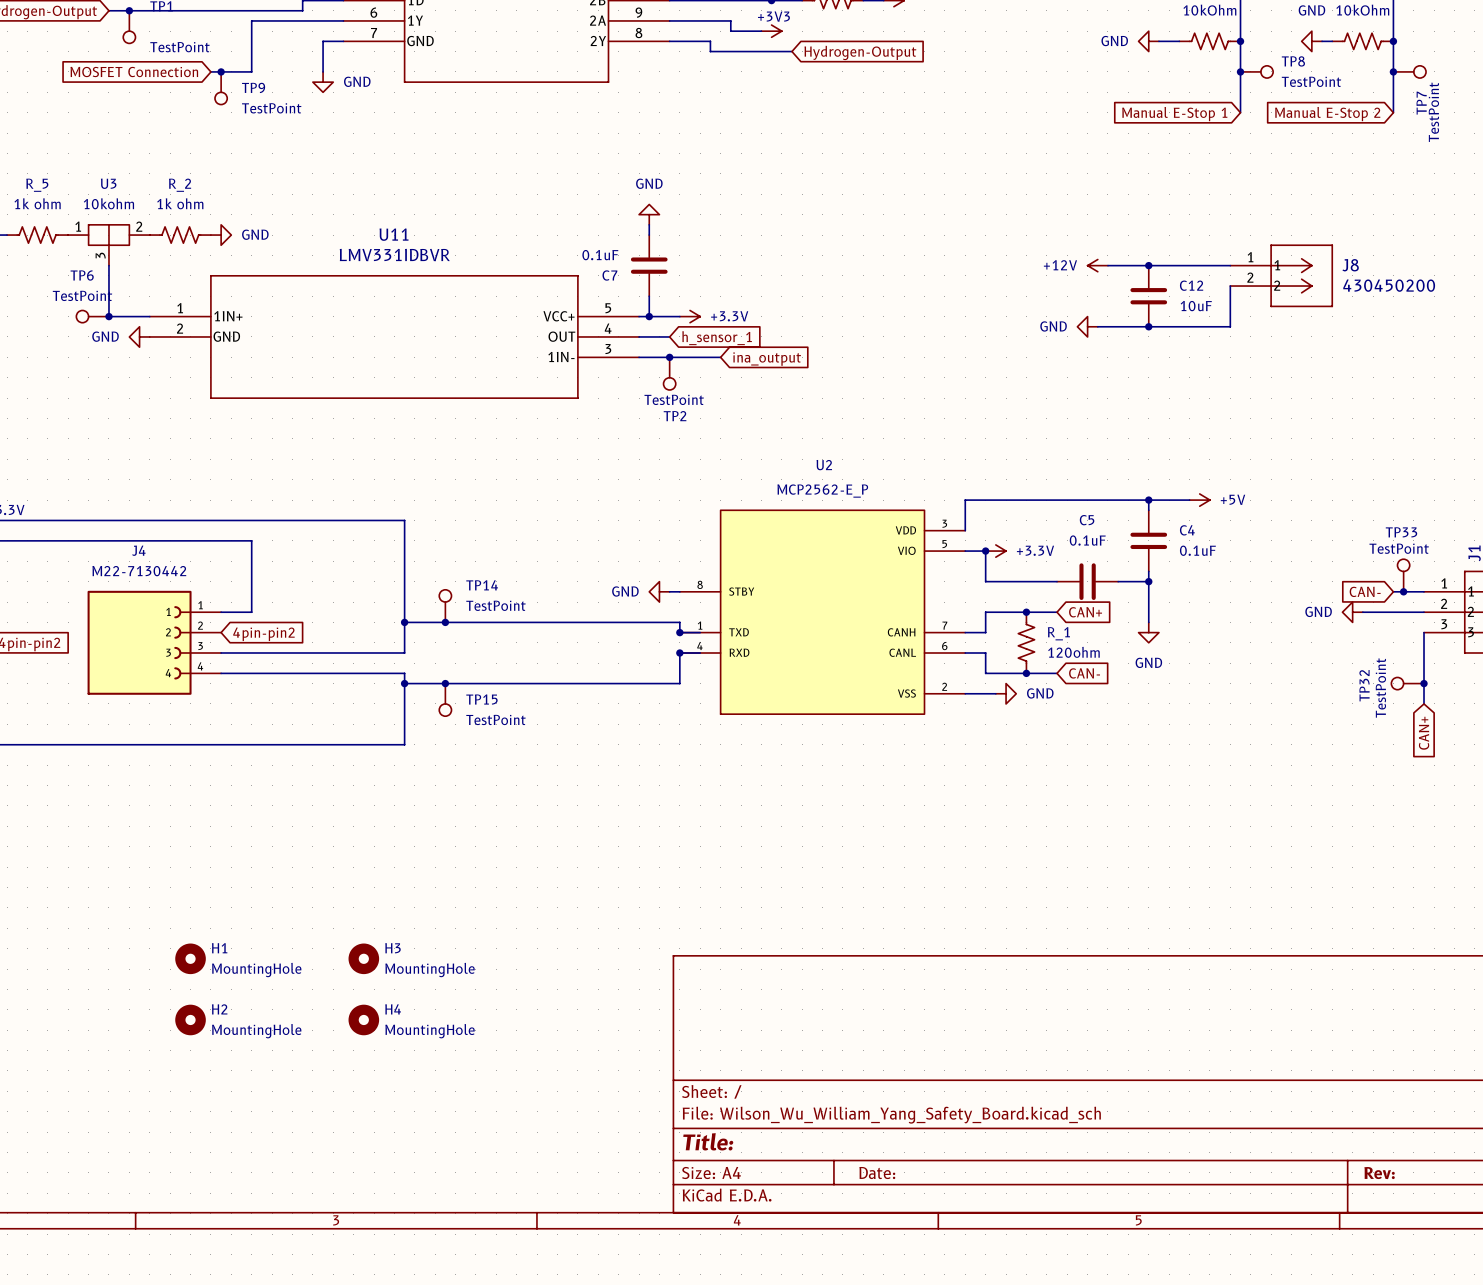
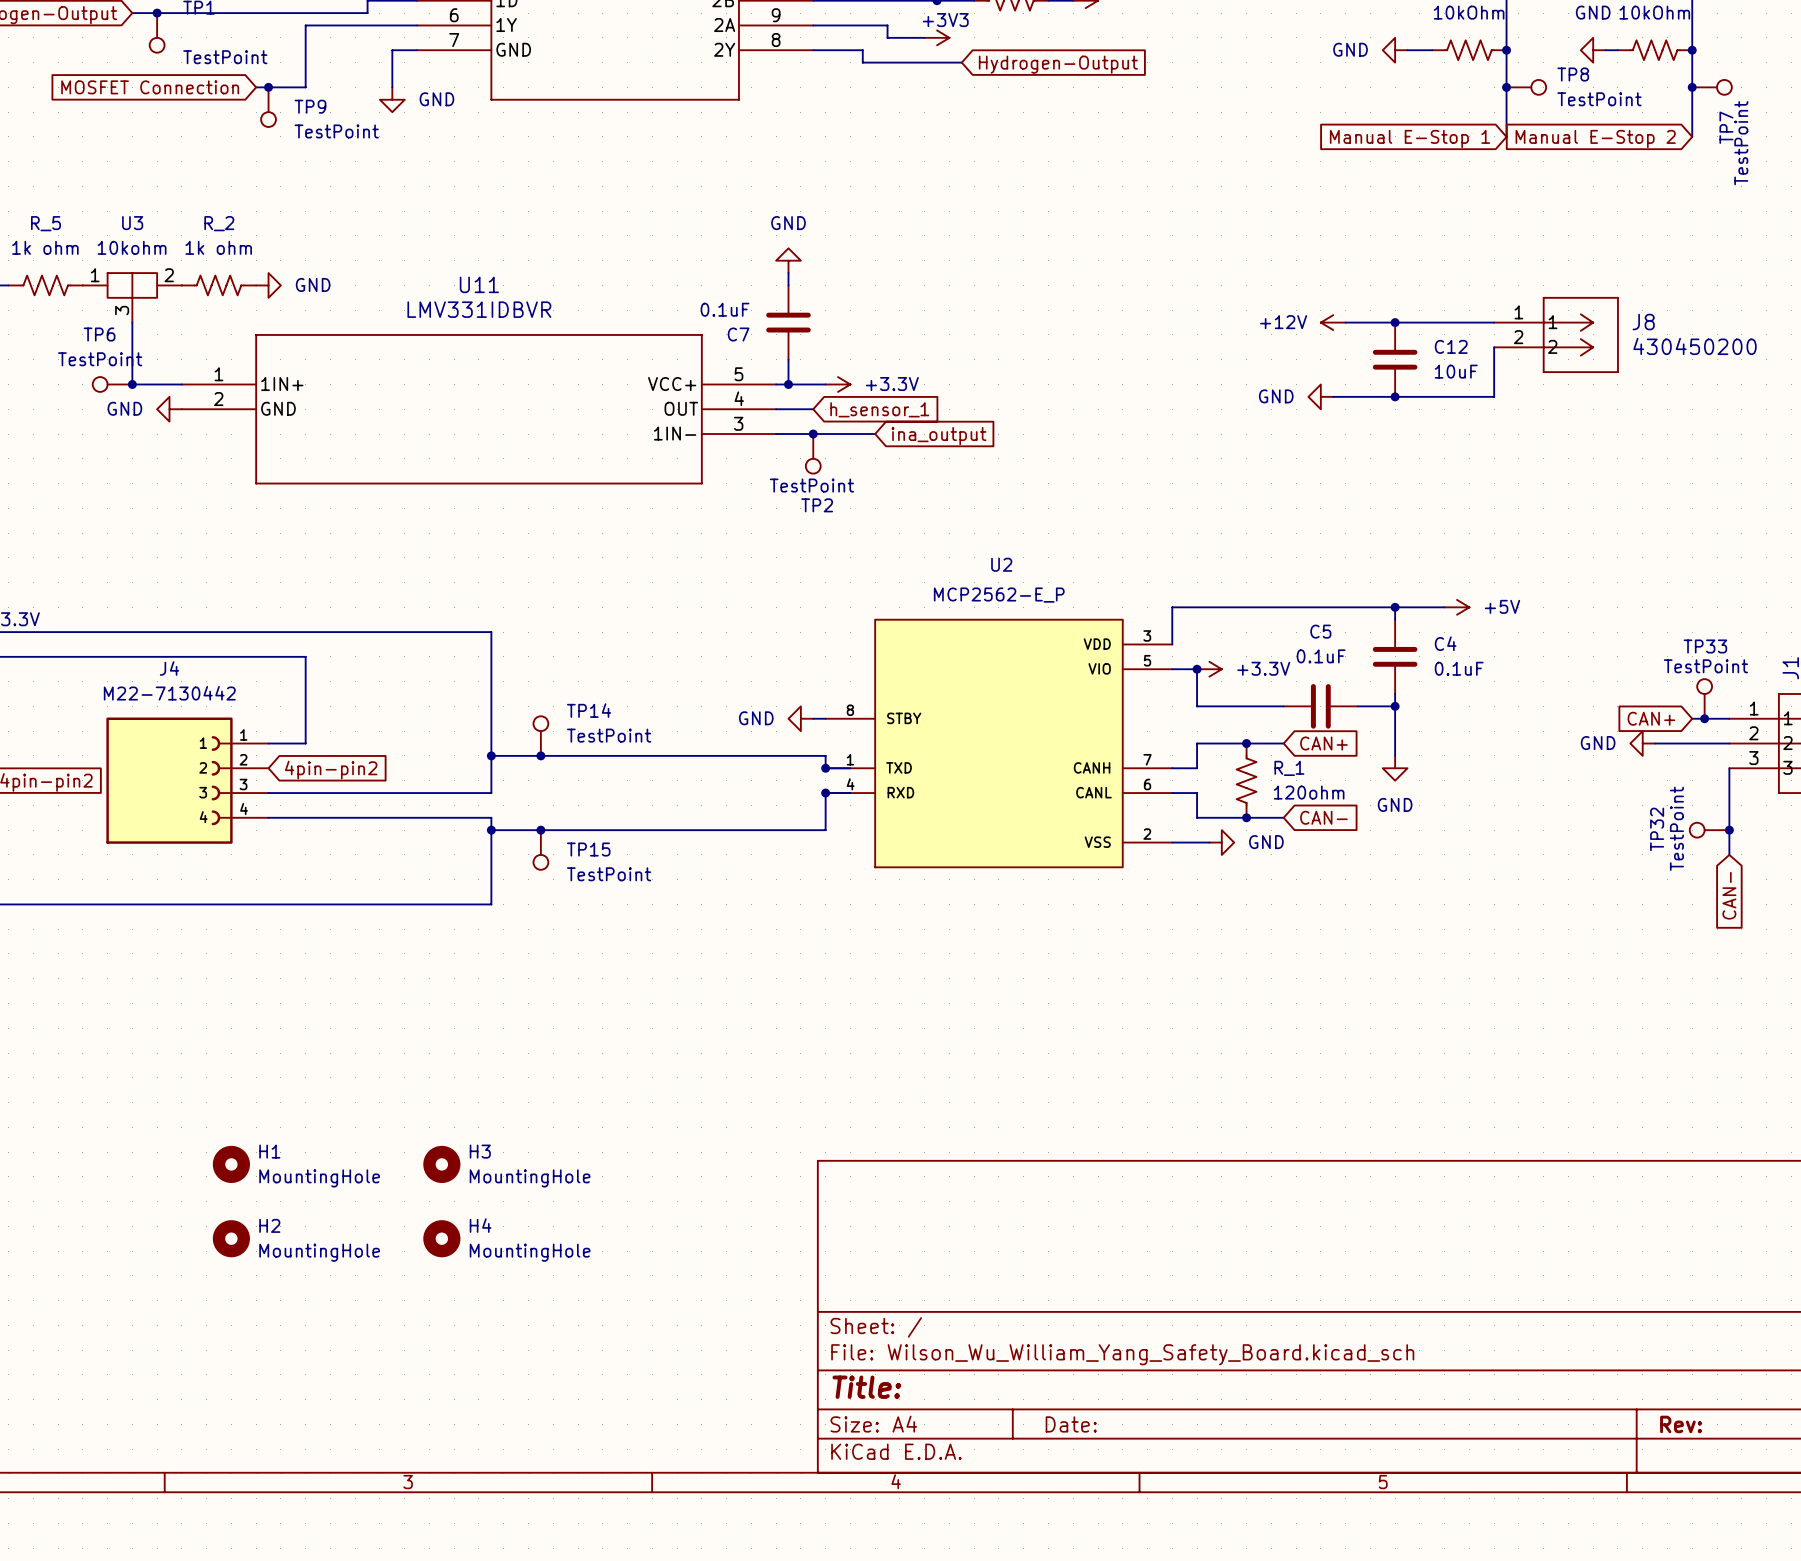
global label: CAN- (1365, 591) -> CAN+ (1651, 718)
global label: CAN+ (1424, 733) -> CAN- (1729, 895)

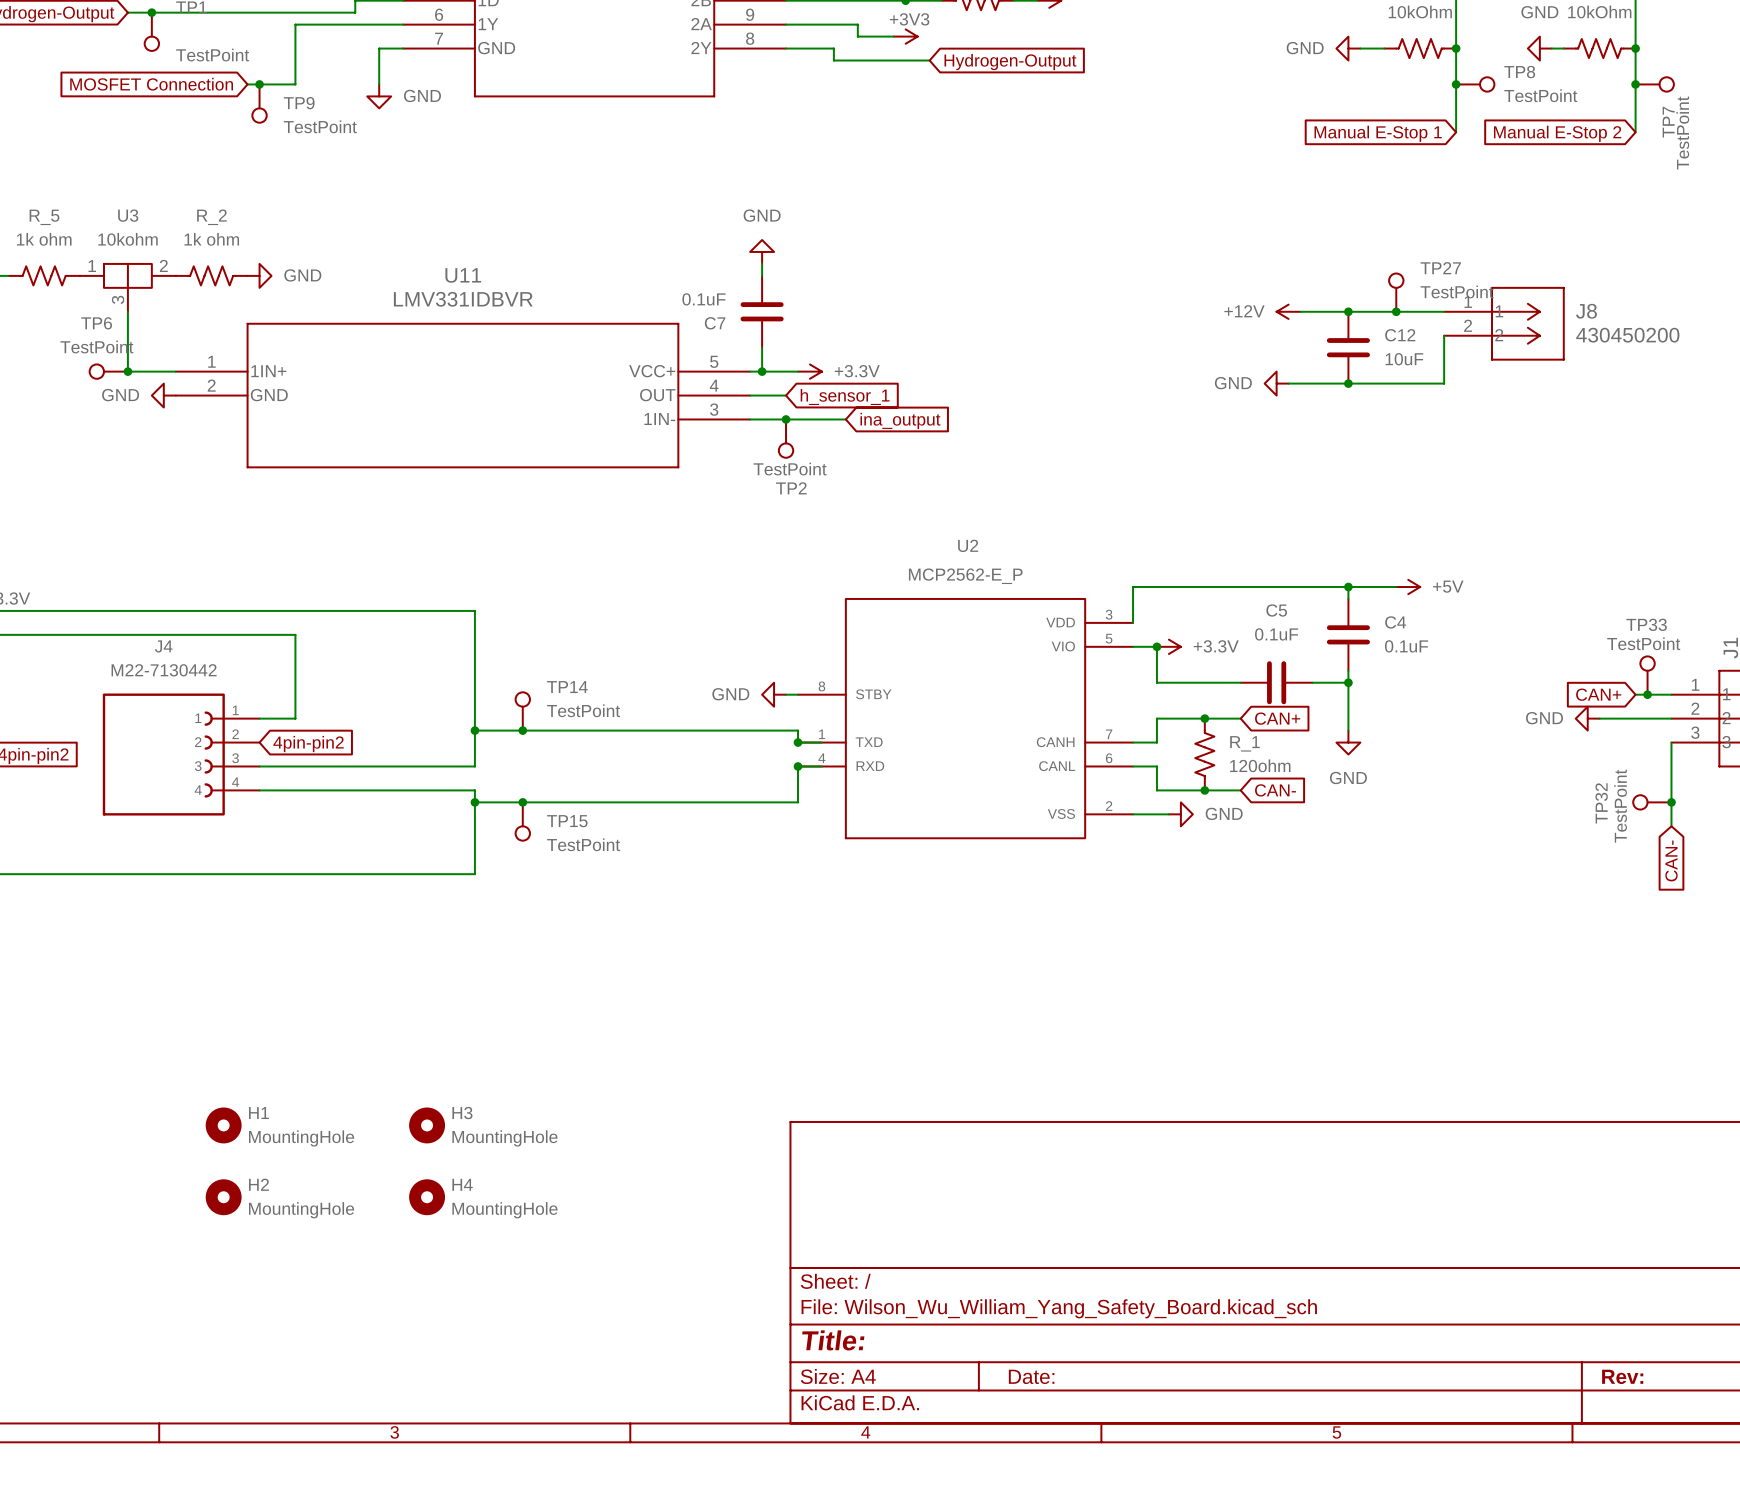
TP27: none -> TestPoint (1396, 292)
junction: none -> (1396, 311)

